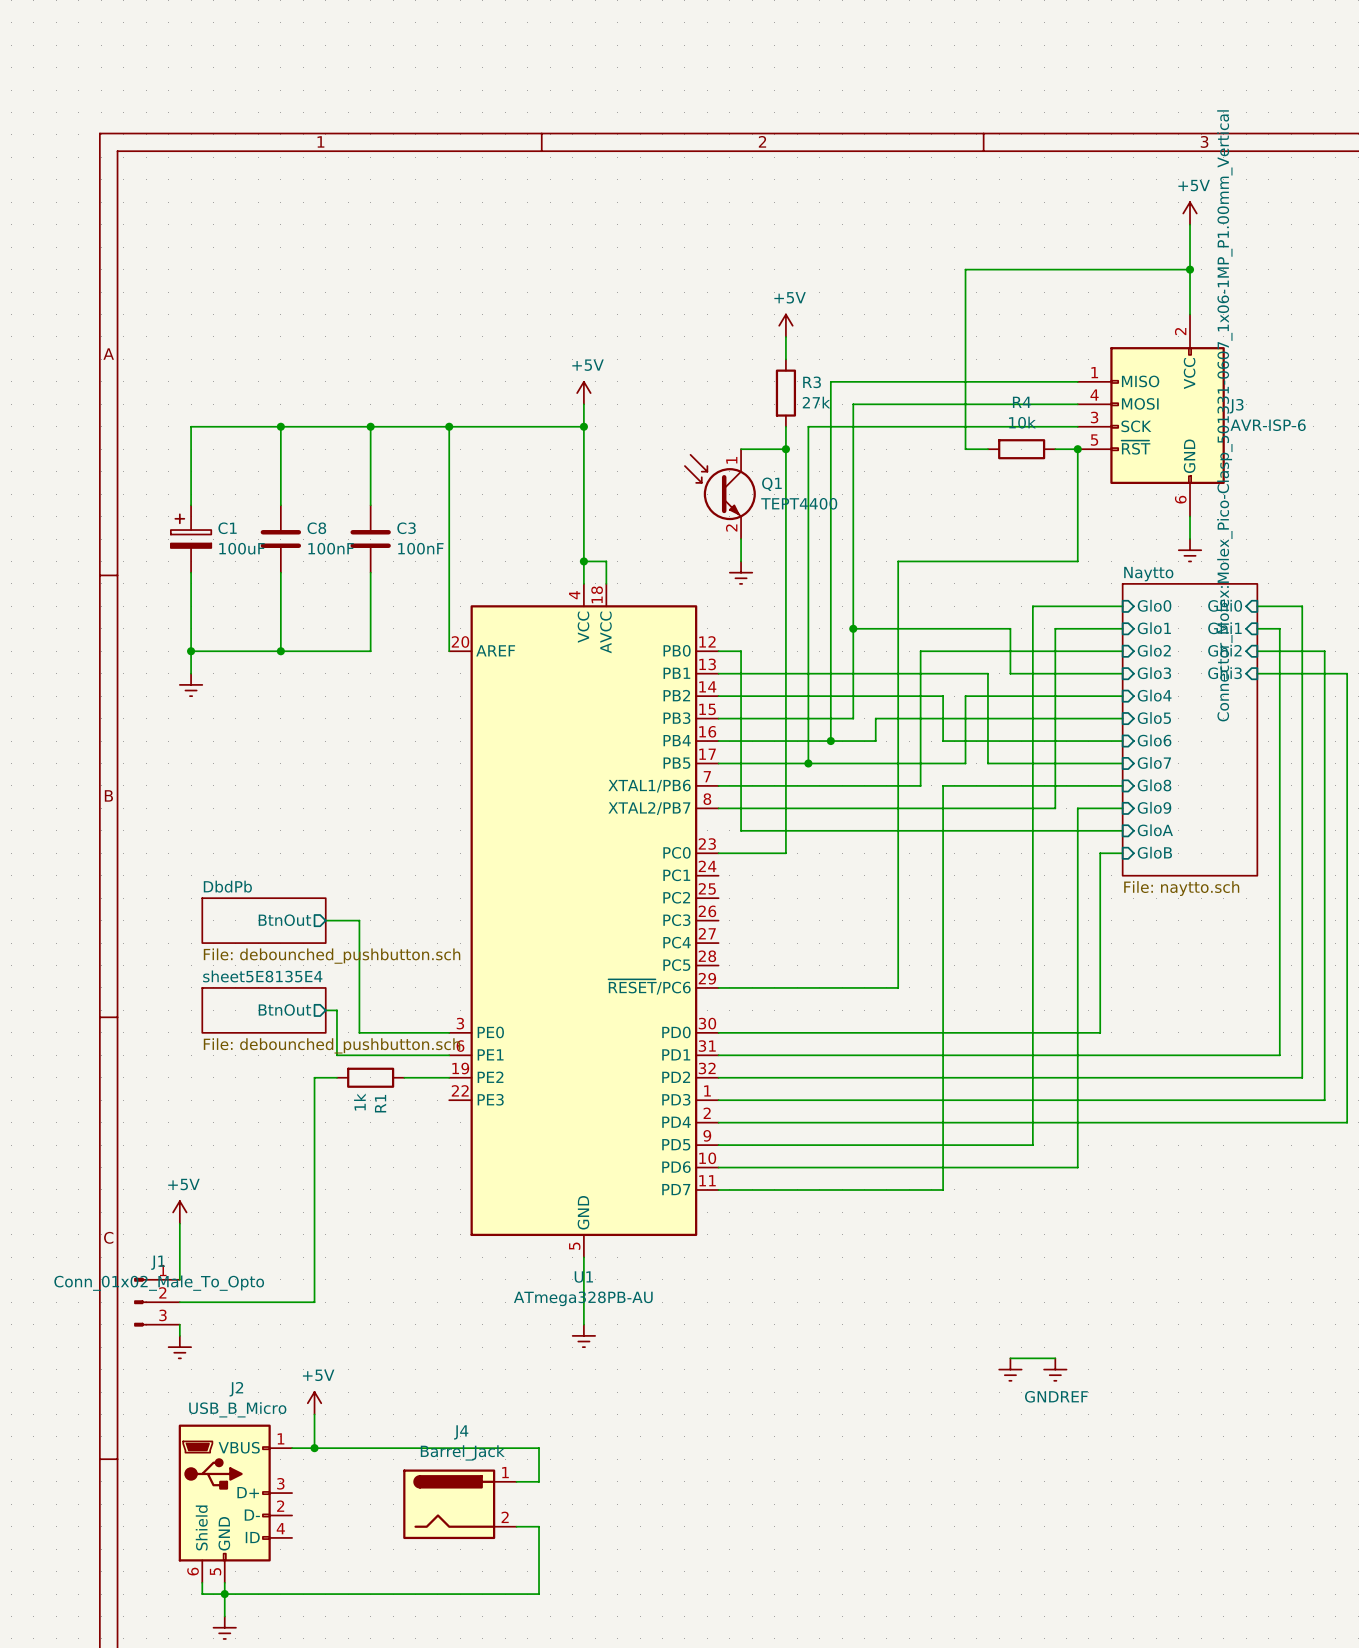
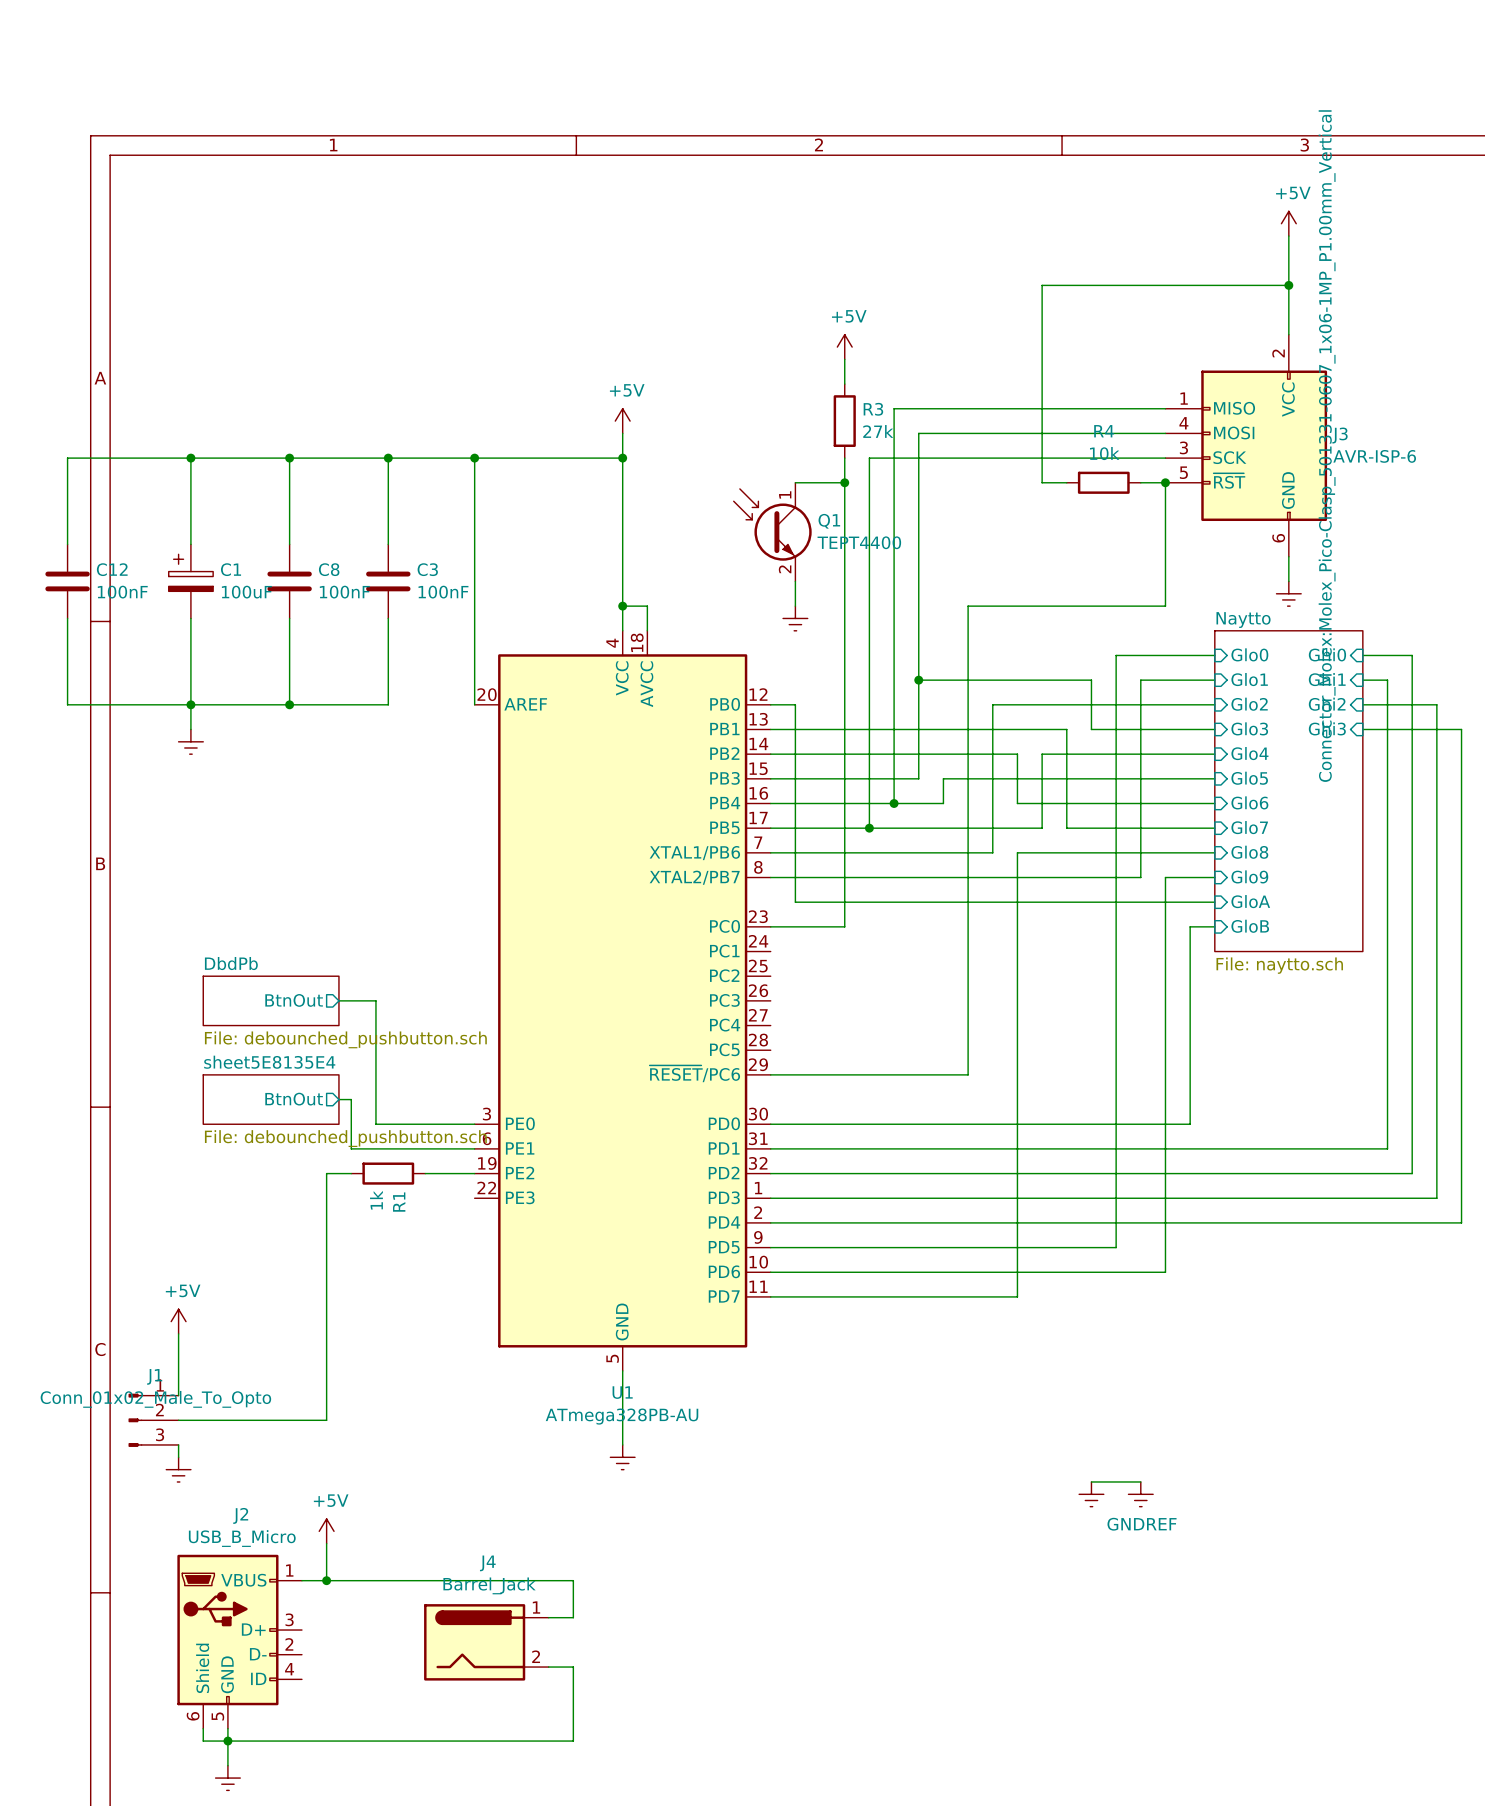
wire: none -> (190, 458) (67, 458) (67, 544)
junction: none -> (190, 458)
C12: none -> 100nF (67, 581)
wire: none -> (67, 618) (67, 704) (190, 704)

